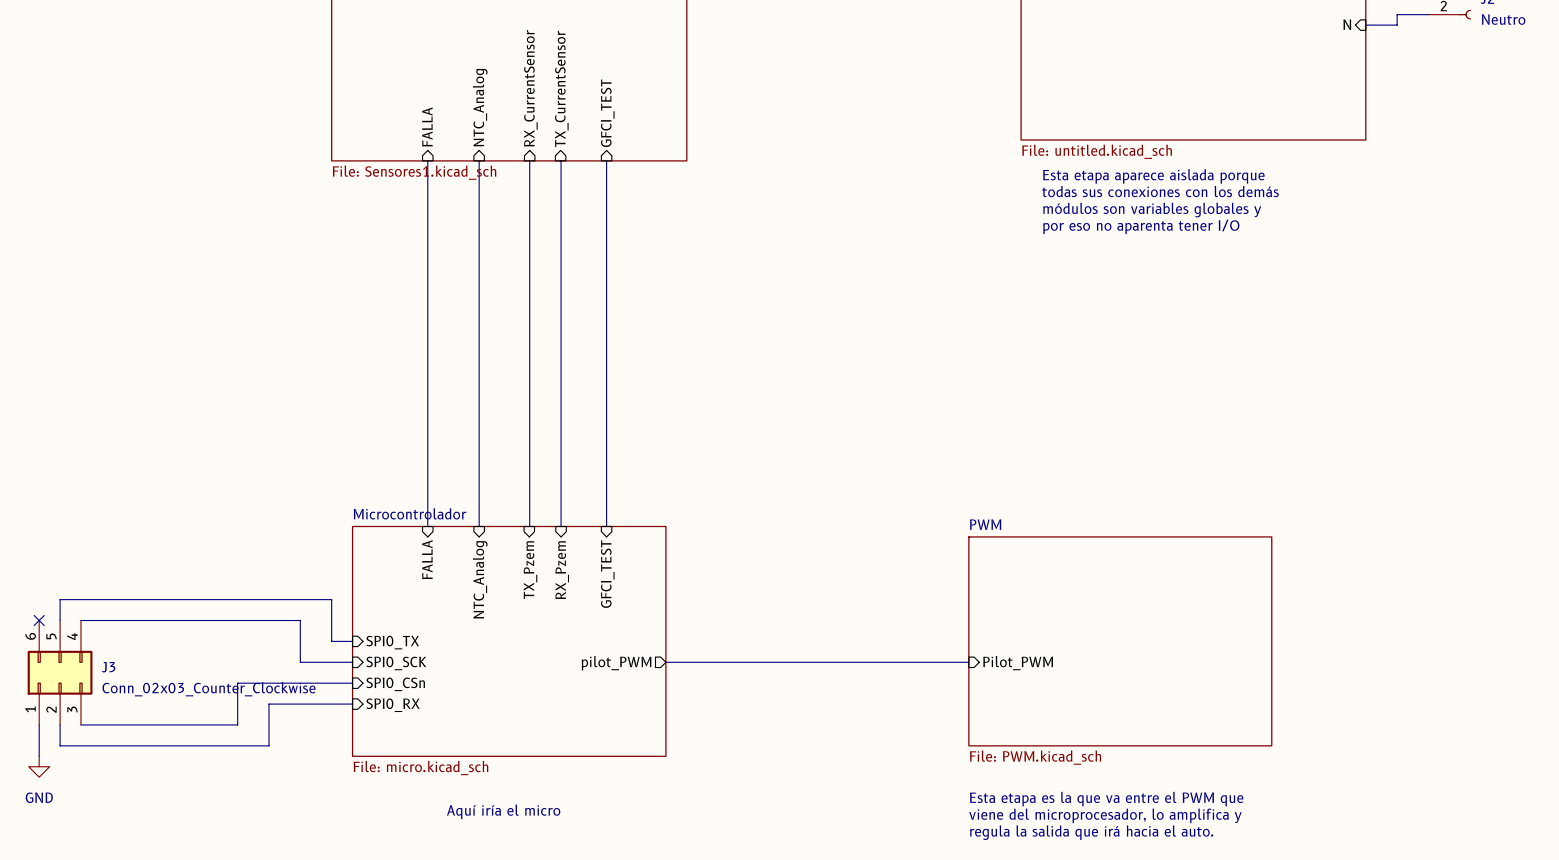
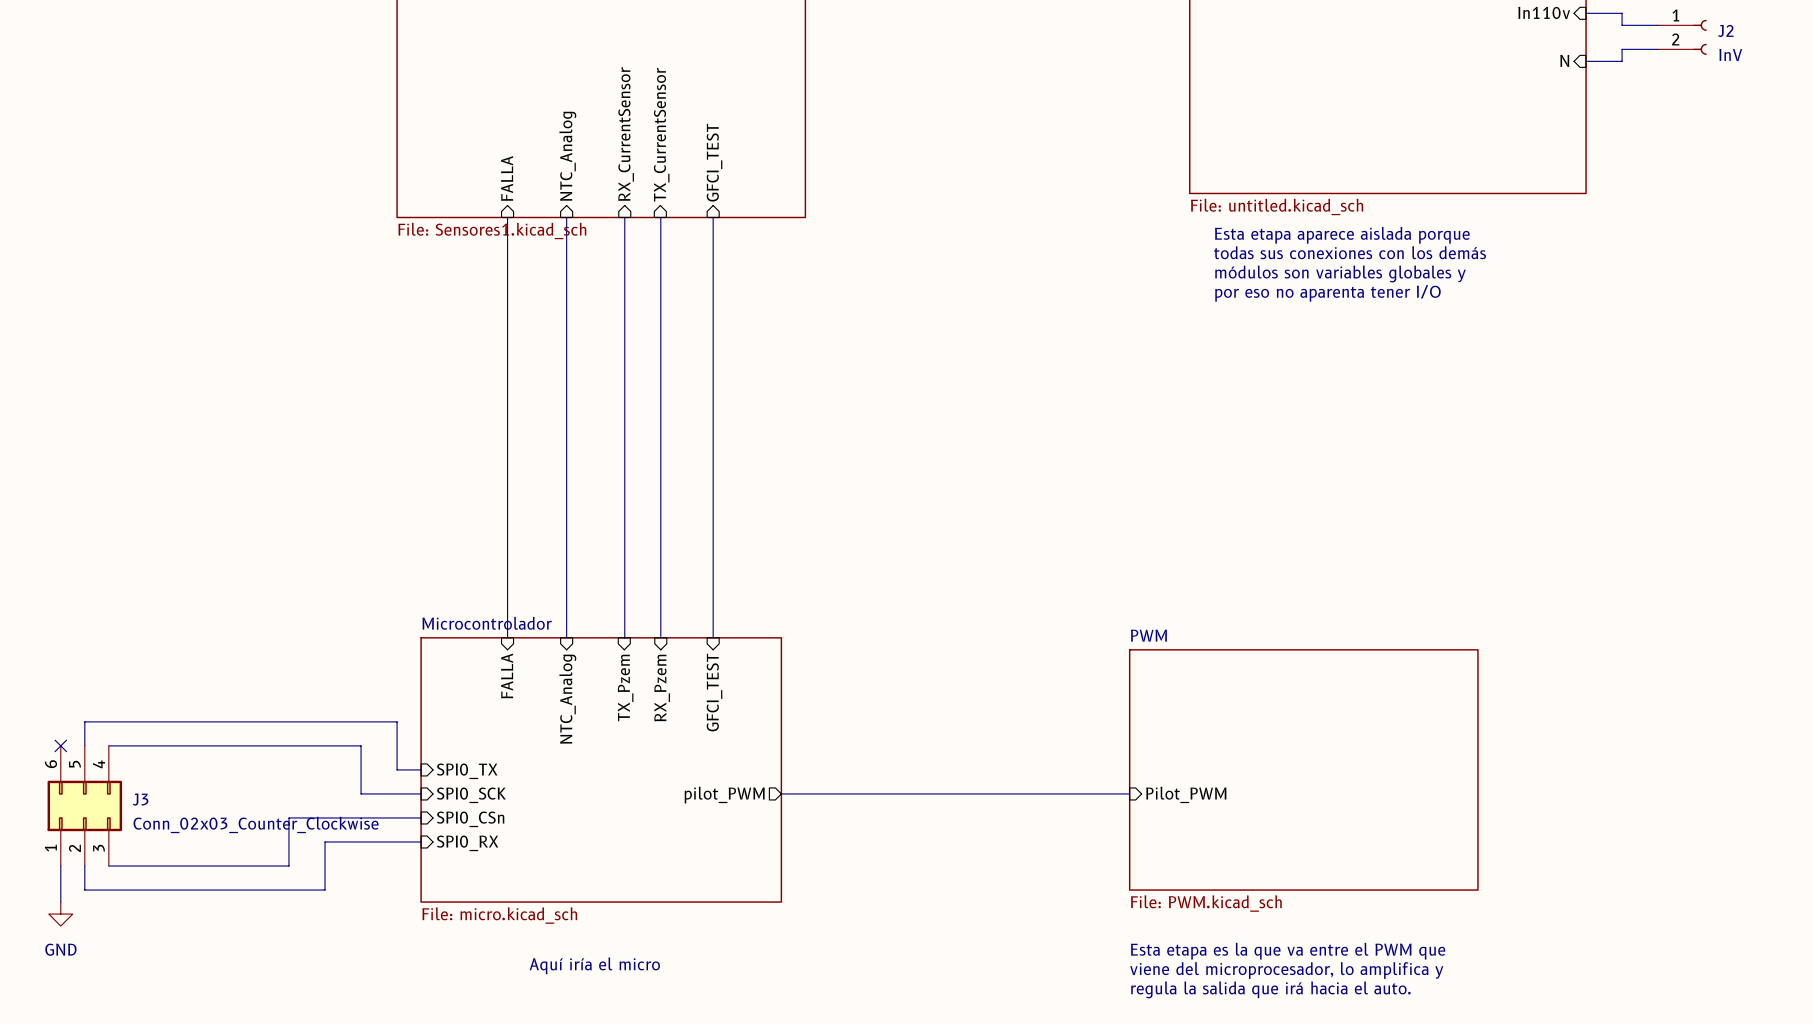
J2 value: Neutro (1503, 19) -> InV (1730, 54)

